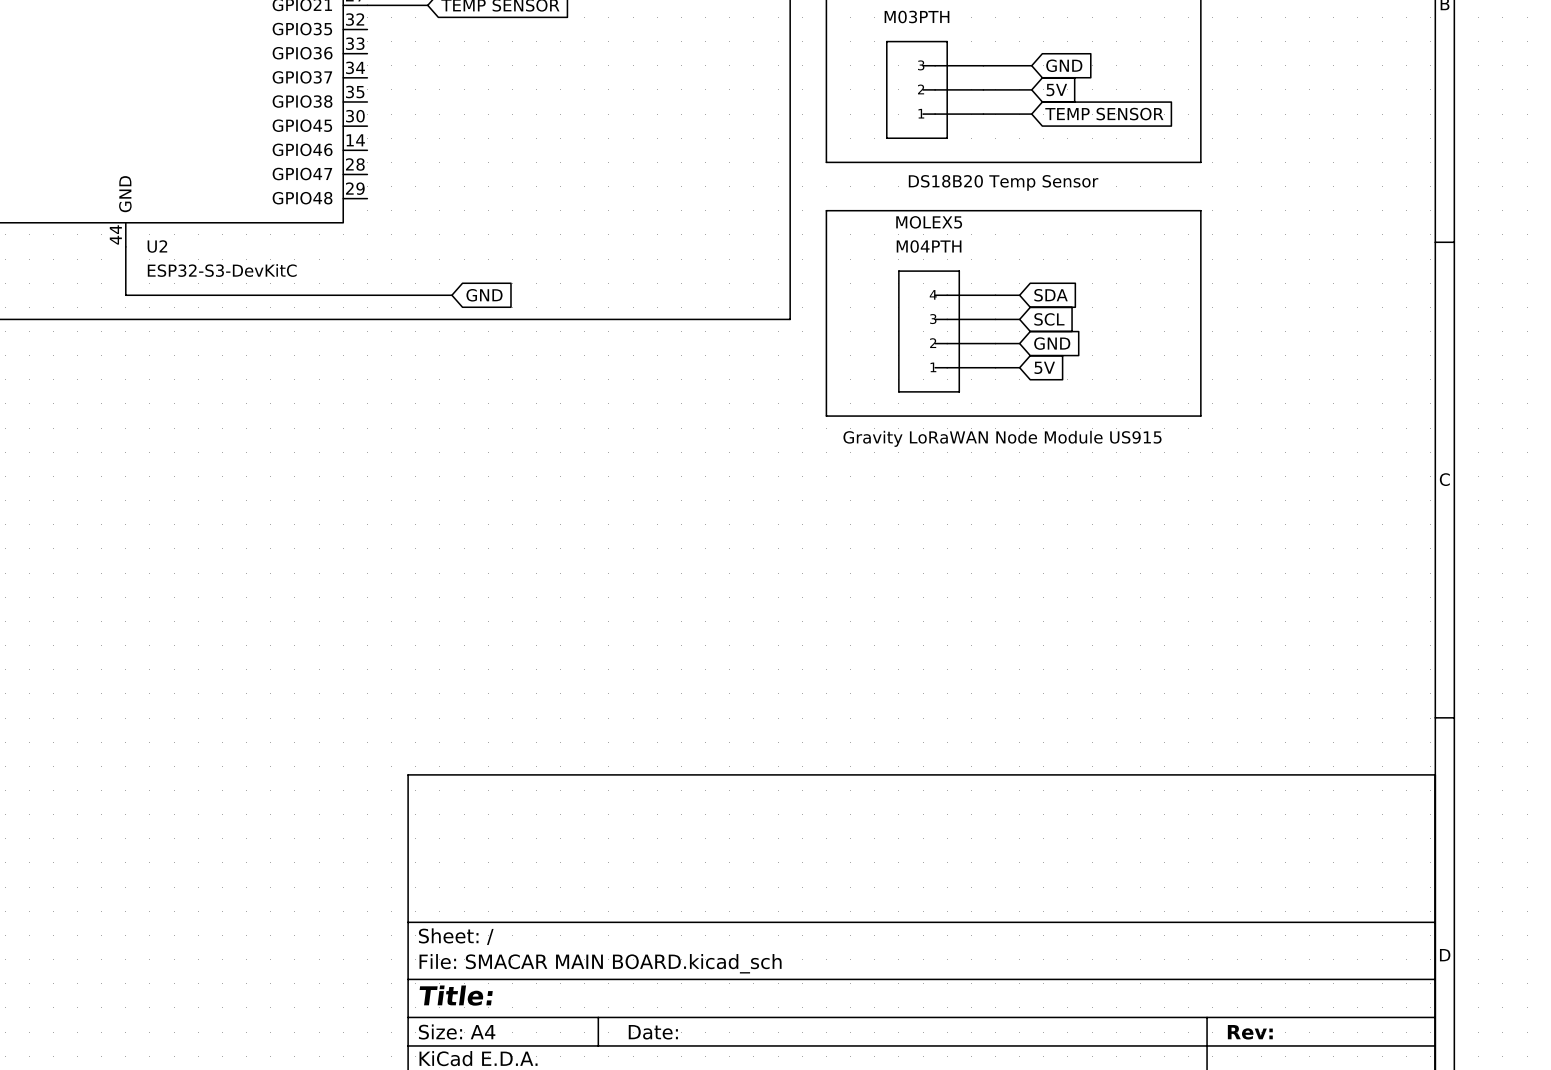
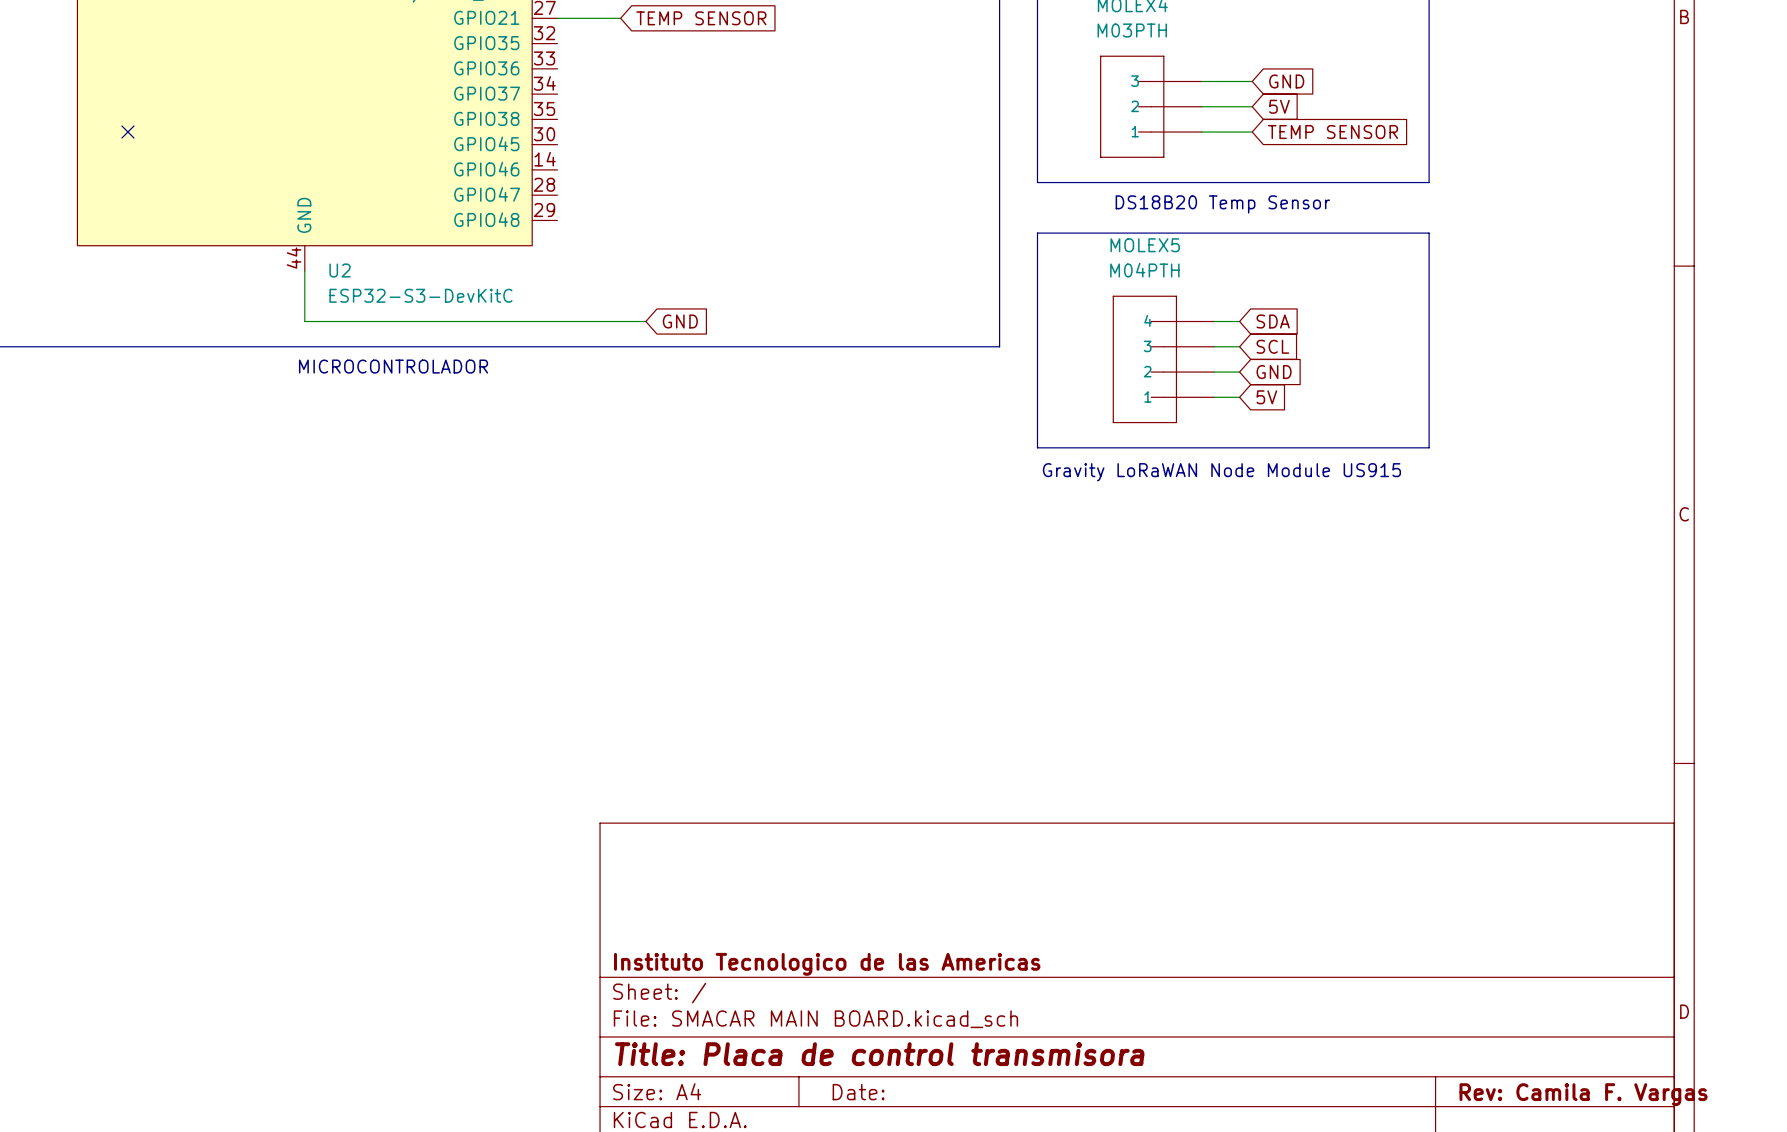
text: none -> MICROCONTROLADOR (393, 366)
title block: none -> Instituto Tecnologico de las Americas (827, 964)
title block: Title: (456, 995) -> Title: Placa de control transmisora (879, 1054)
title block: Rev: (1250, 1032) -> Rev: Camila F. Vargas (1583, 1094)

